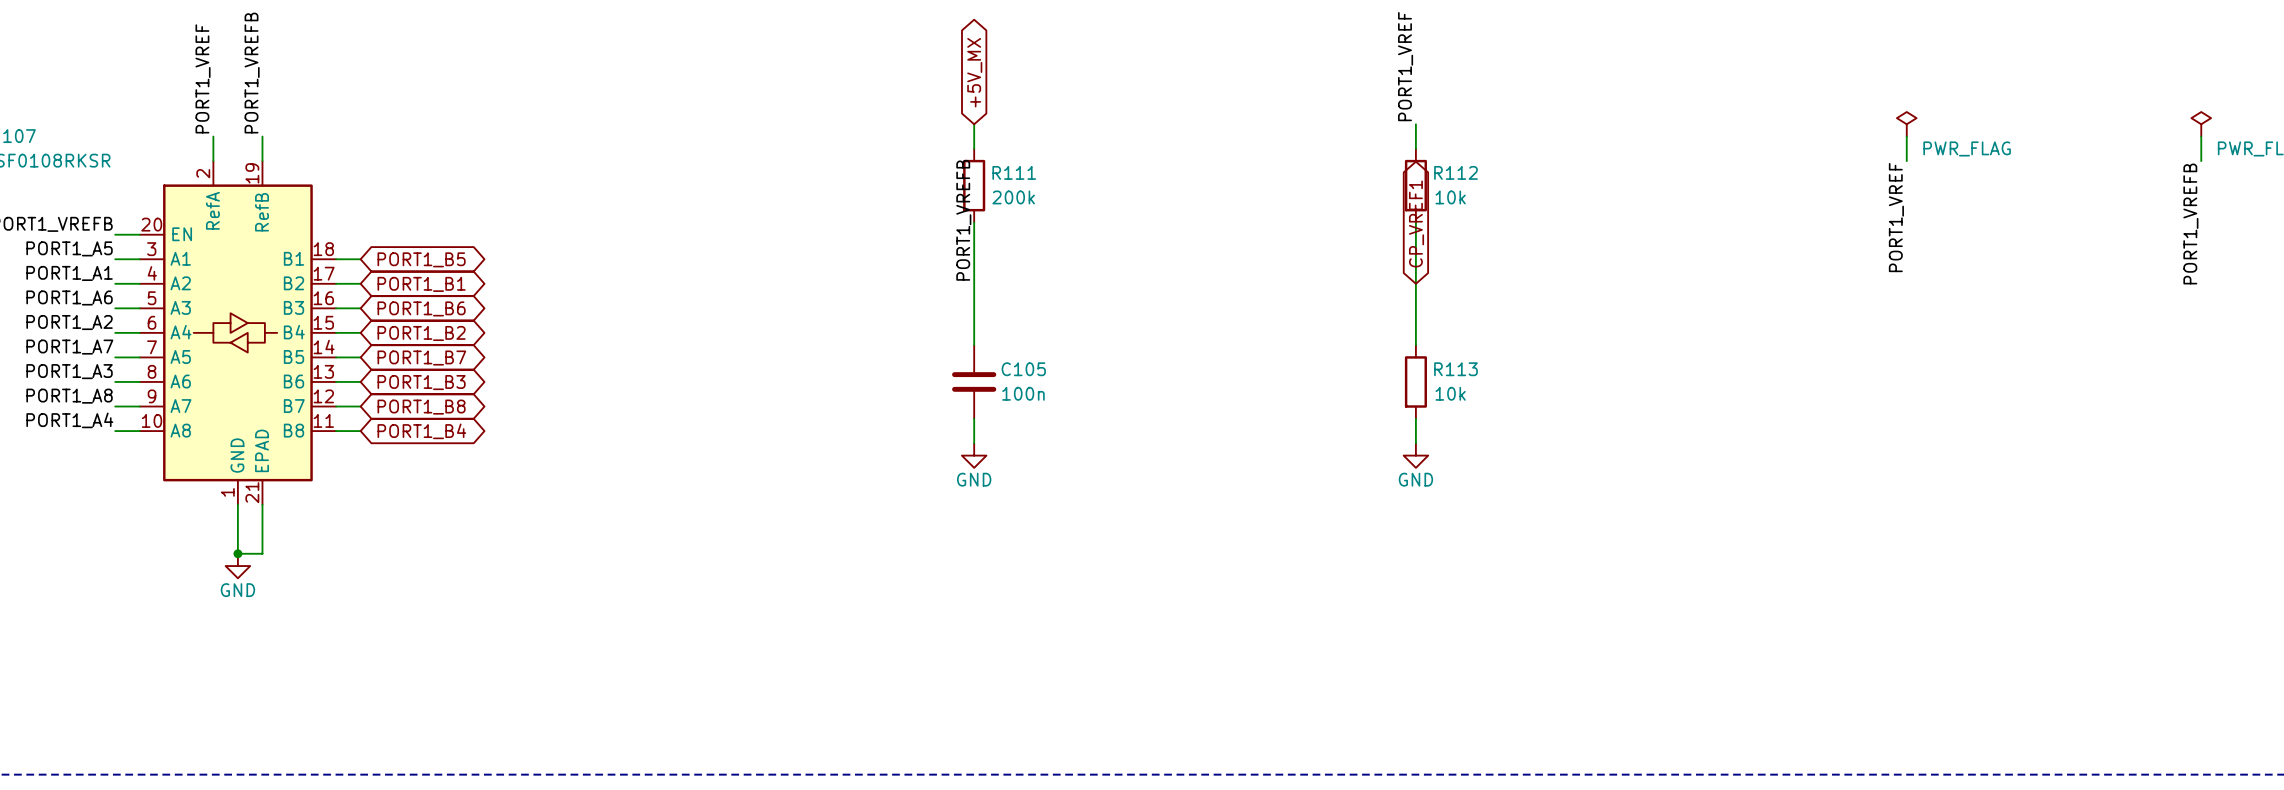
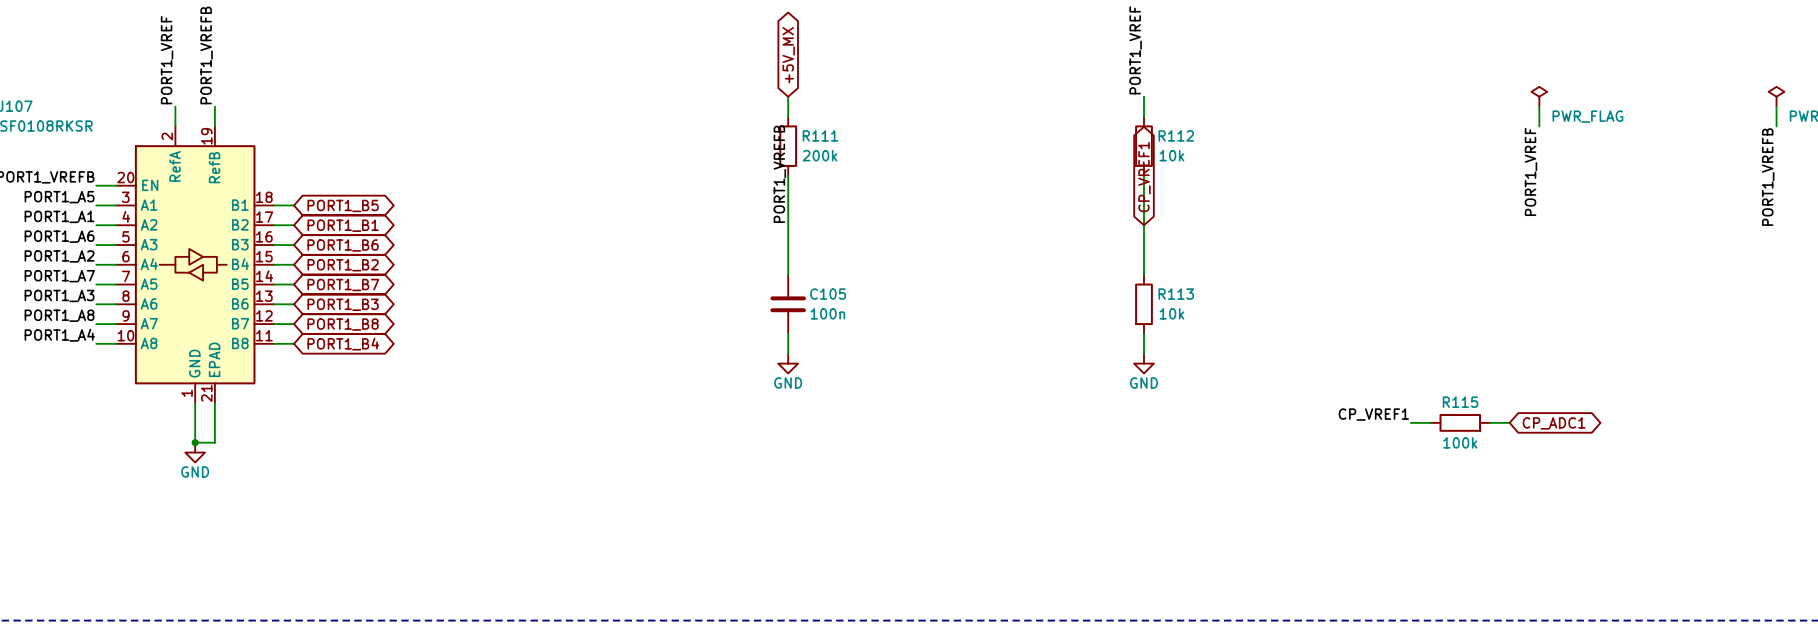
label: none -> CP_VREF1 (1373, 414)
wire: none -> (1410, 422) (1430, 422)
R115: none -> 100k (1460, 422)
wire: none -> (1489, 422) (1509, 422)
global label: none -> CP_ADC1 (1554, 423)

